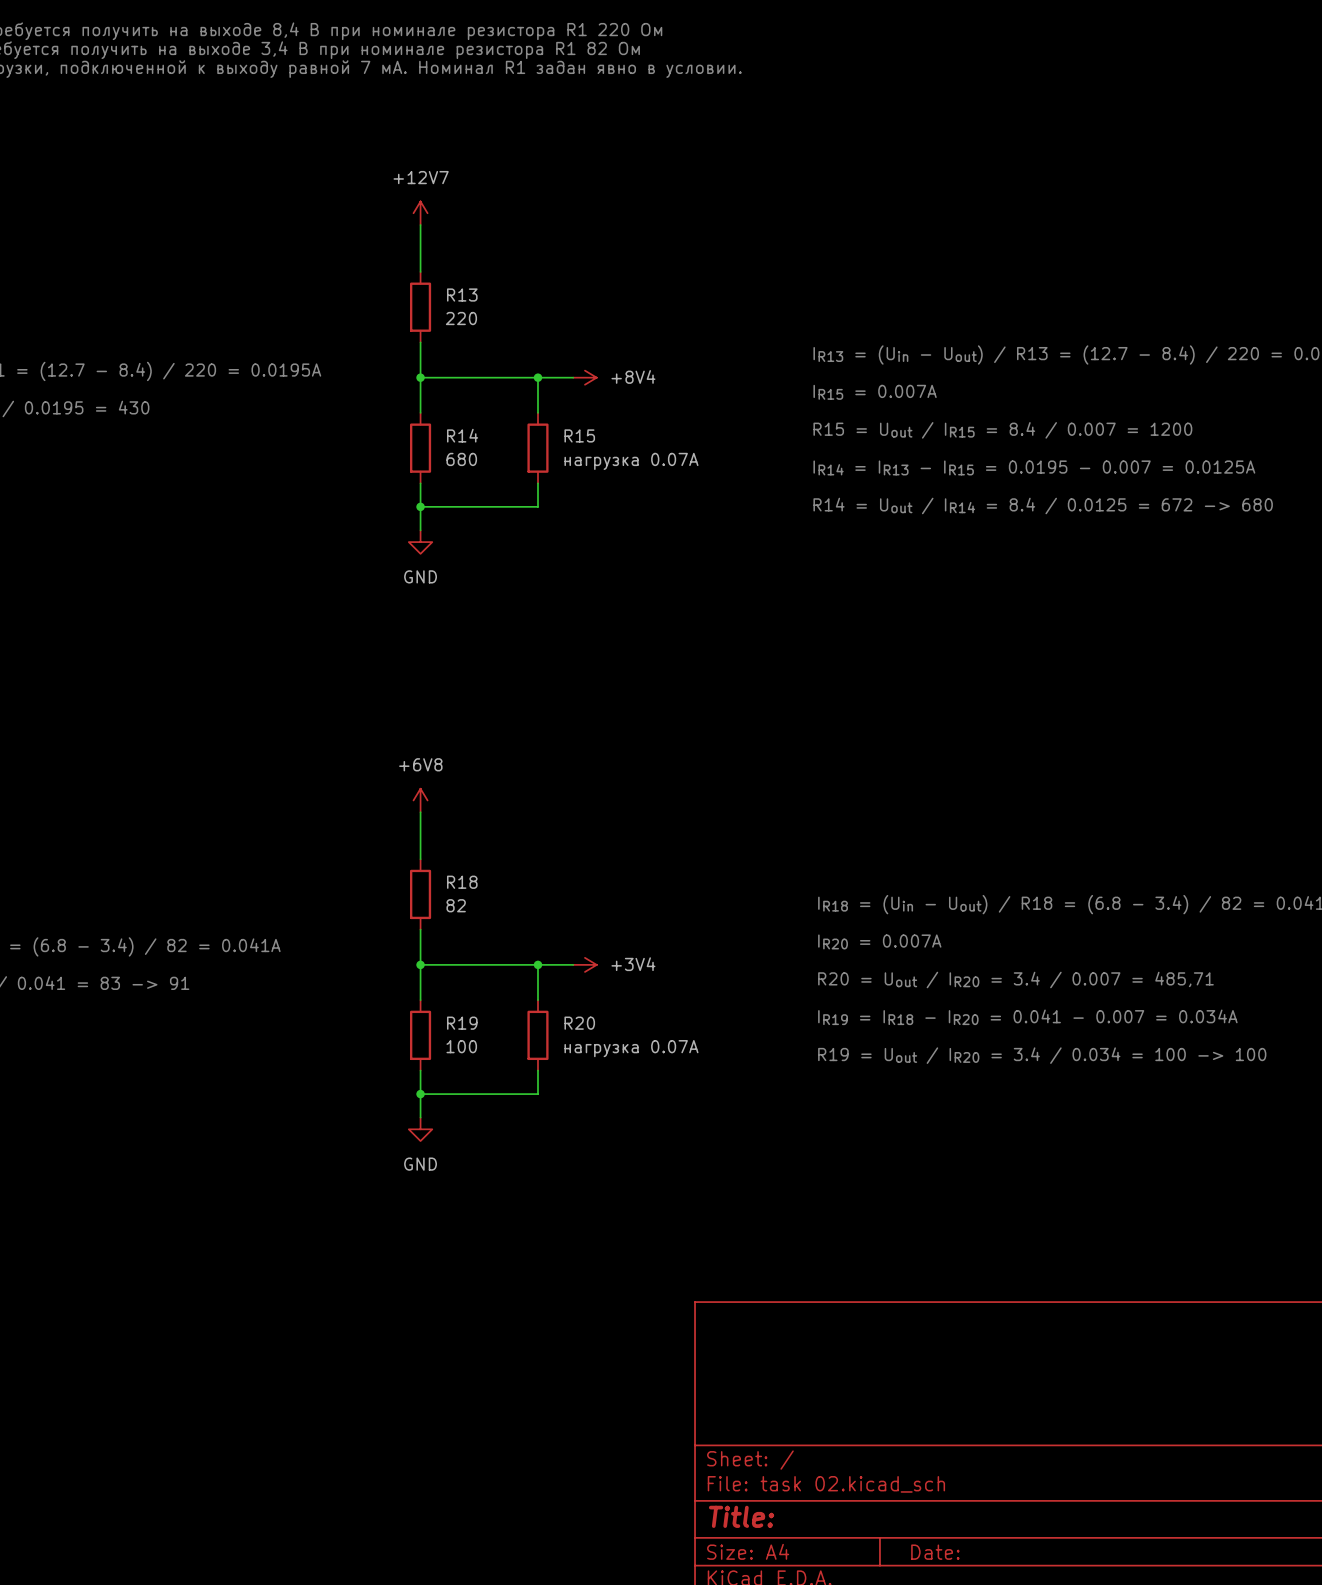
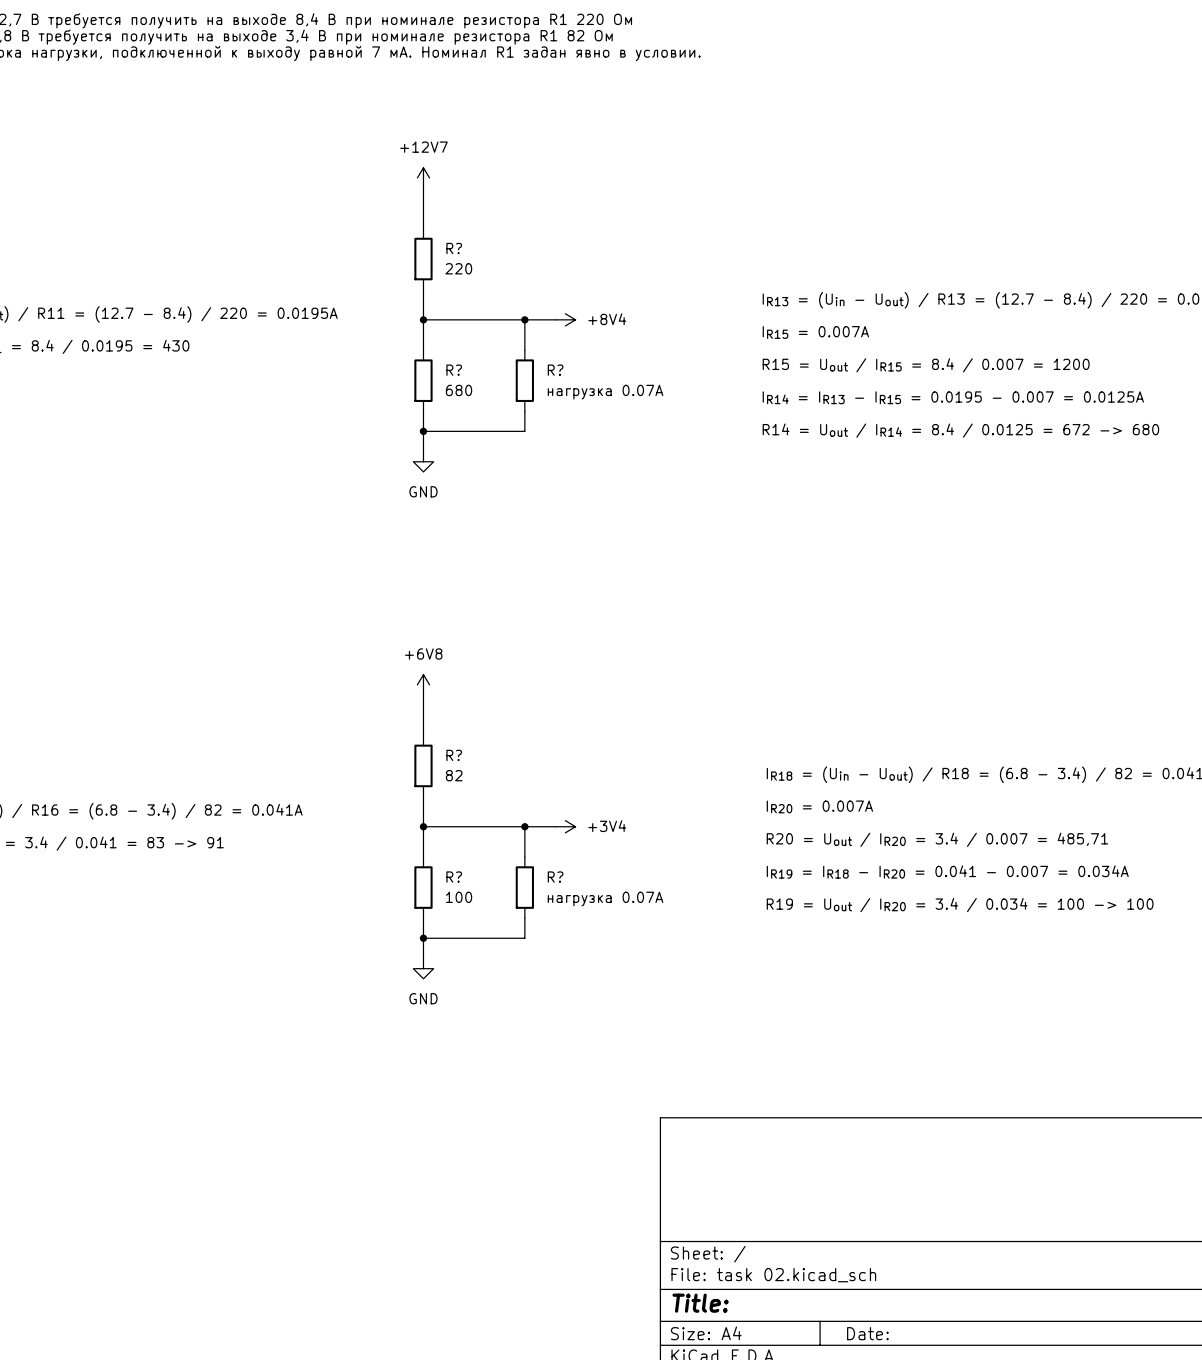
R13 name: R13 (462, 295) -> R? (454, 248)
R14 name: R14 (462, 435) -> R? (454, 370)
R15 name: R15 (579, 435) -> R? (555, 370)
R18 name: R18 (462, 882) -> R? (454, 755)
R19 name: R19 (462, 1023) -> R? (454, 877)
R20 name: R20 (579, 1023) -> R? (555, 877)

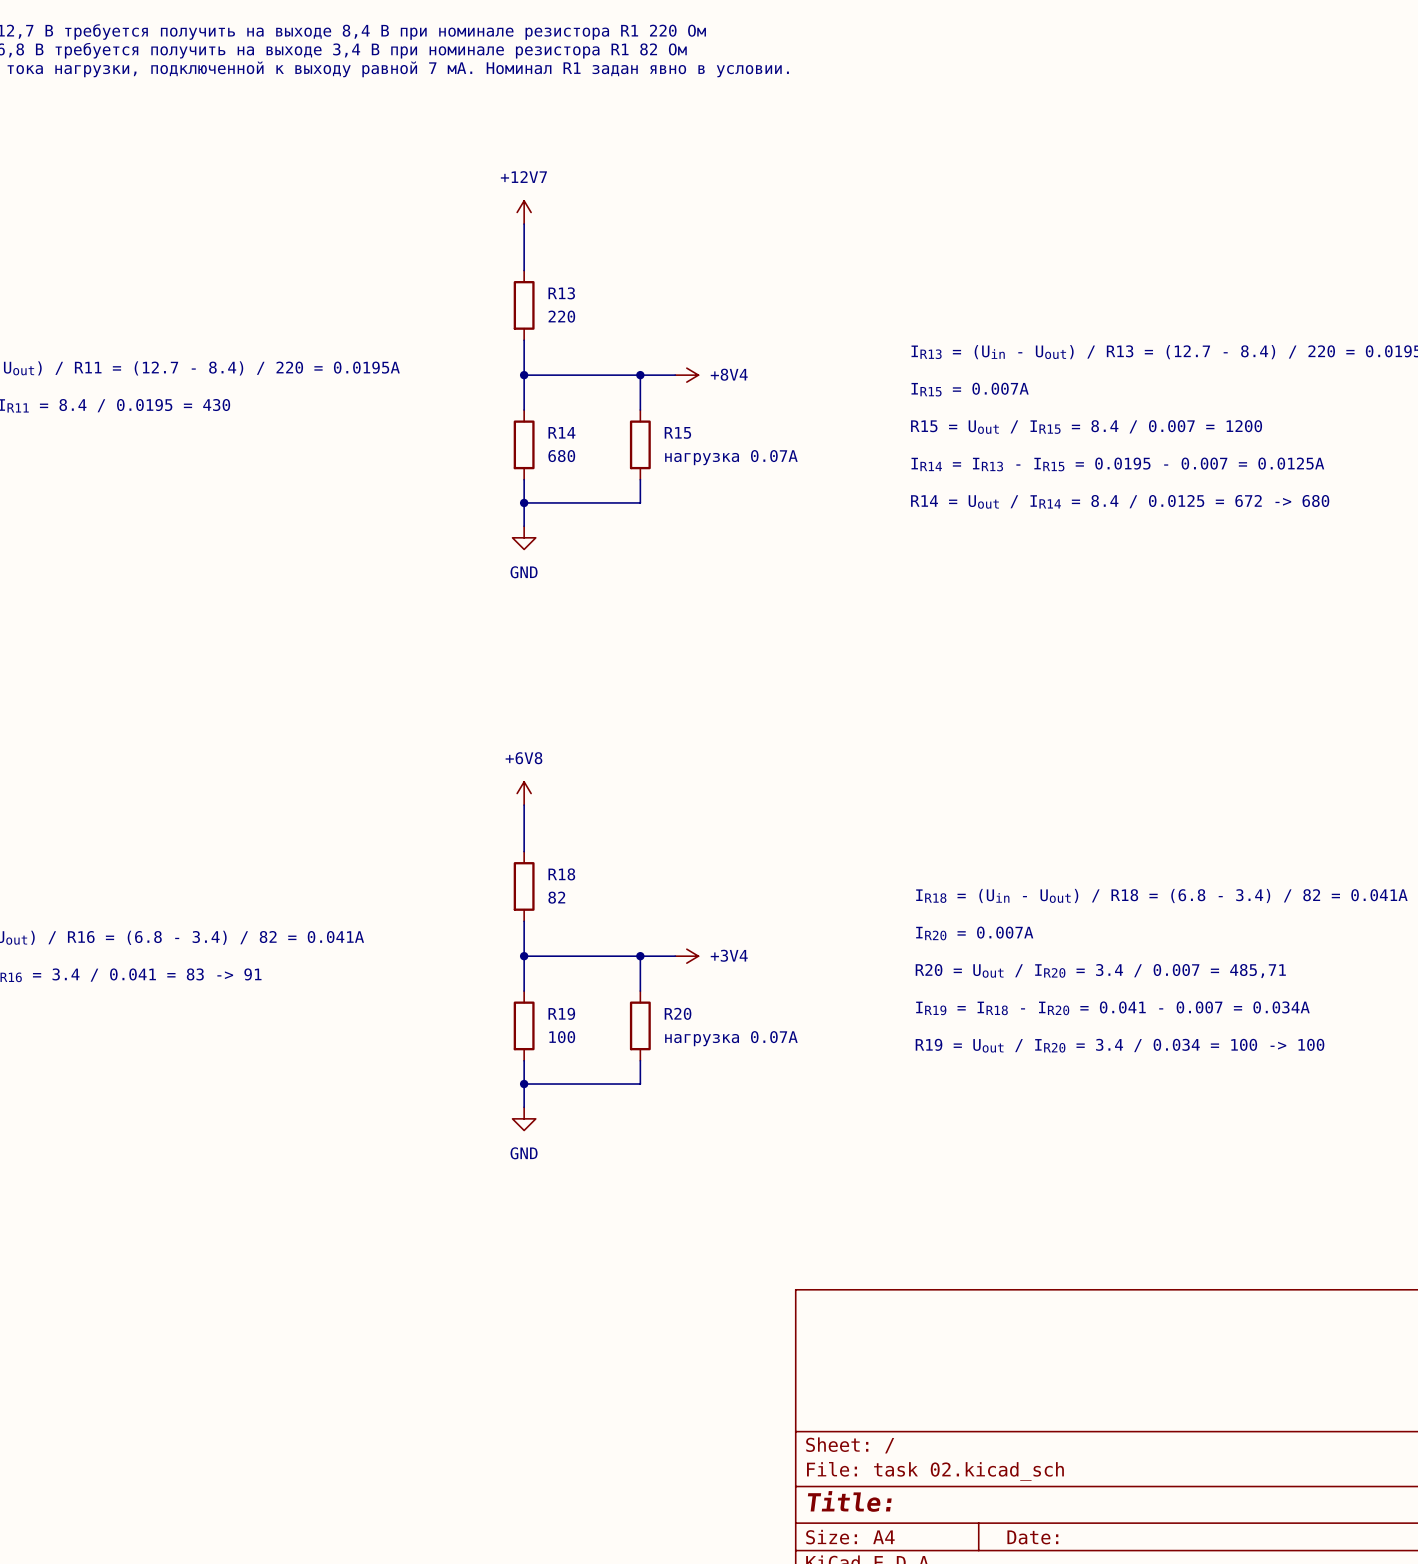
R? name: R? (454, 248) -> R13 (561, 293)
R? name: R? (454, 370) -> R14 (561, 432)
R? name: R? (555, 370) -> R15 (677, 432)
R? name: R? (454, 755) -> R18 (561, 874)
R? name: R? (454, 877) -> R19 (561, 1013)
R? name: R? (555, 877) -> R20 (678, 1013)

